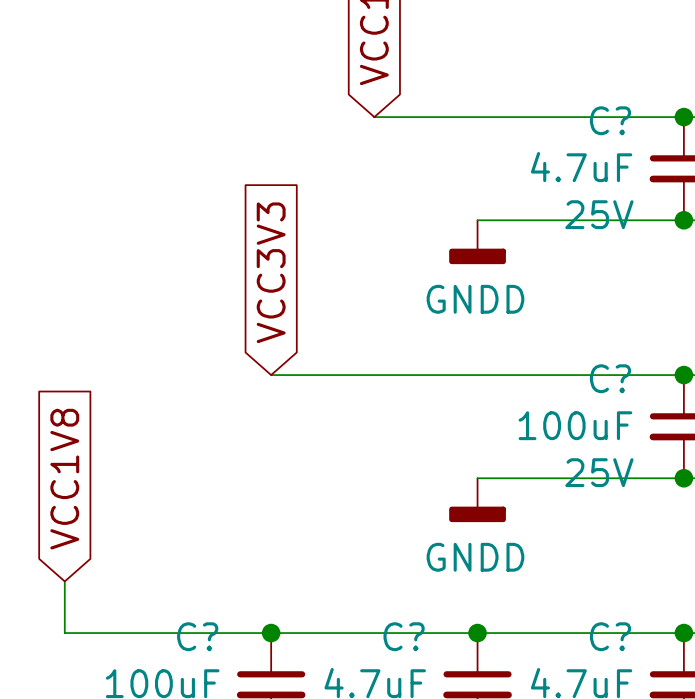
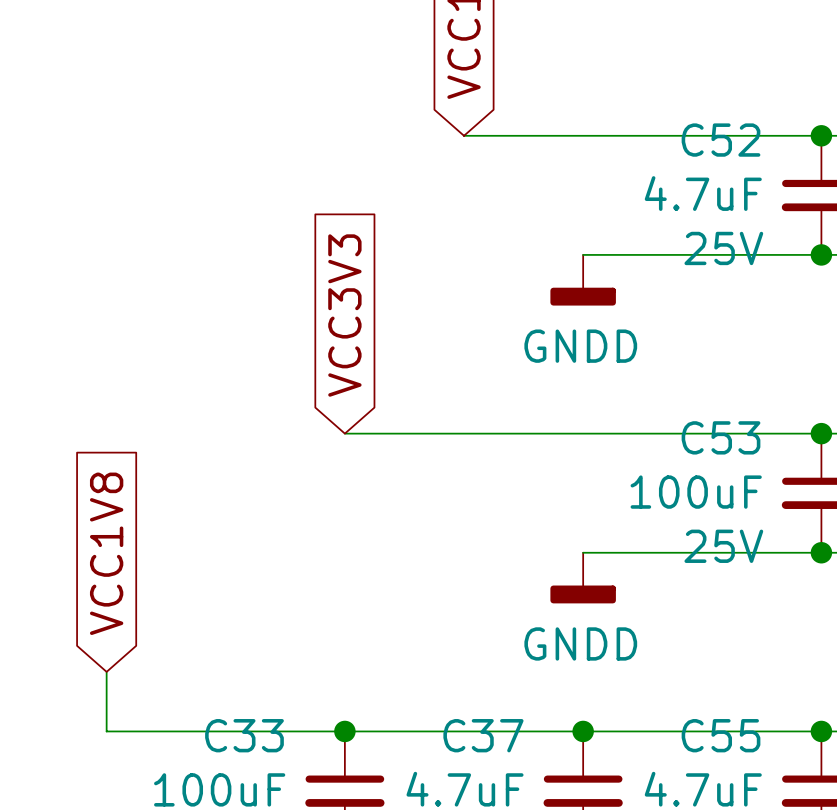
C? name: C? (610, 120) -> C52 (721, 140)
C? name: C? (610, 378) -> C53 (721, 437)
C? name: C? (197, 636) -> C33 (244, 735)
C? name: C? (404, 636) -> C37 (483, 735)
C? name: C? (610, 636) -> C55 (721, 735)

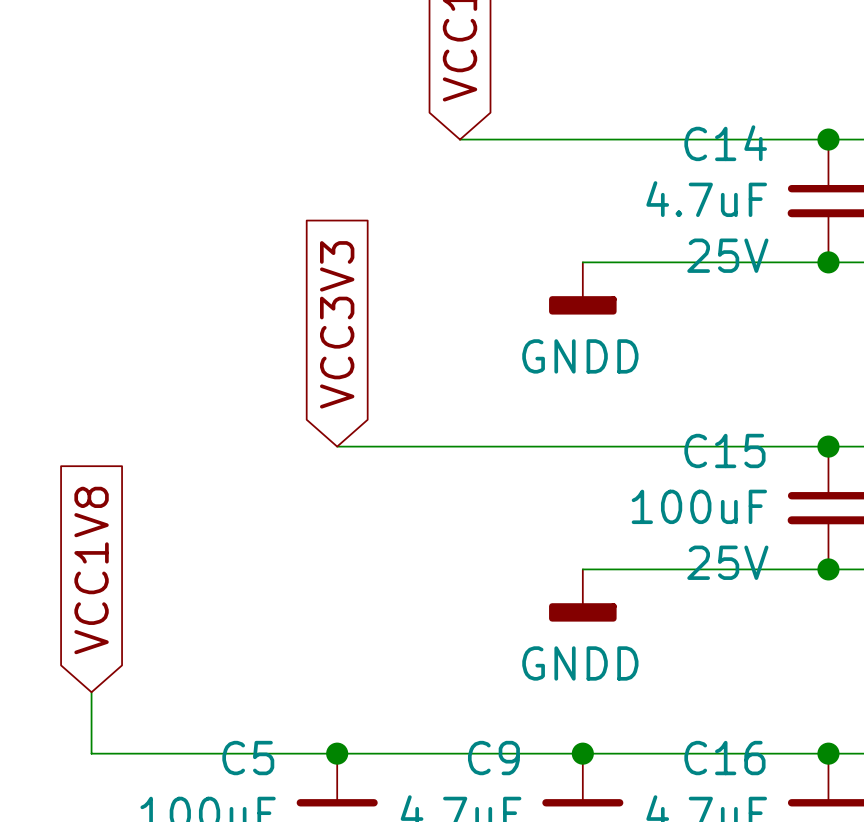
C52 name: C52 (721, 140) -> C14 (725, 143)
C53 name: C53 (721, 437) -> C15 (724, 450)
C33 name: C33 (244, 735) -> C5 (248, 758)
C37 name: C37 (483, 735) -> C9 (493, 758)
C55 name: C55 (721, 735) -> C16 (724, 758)

